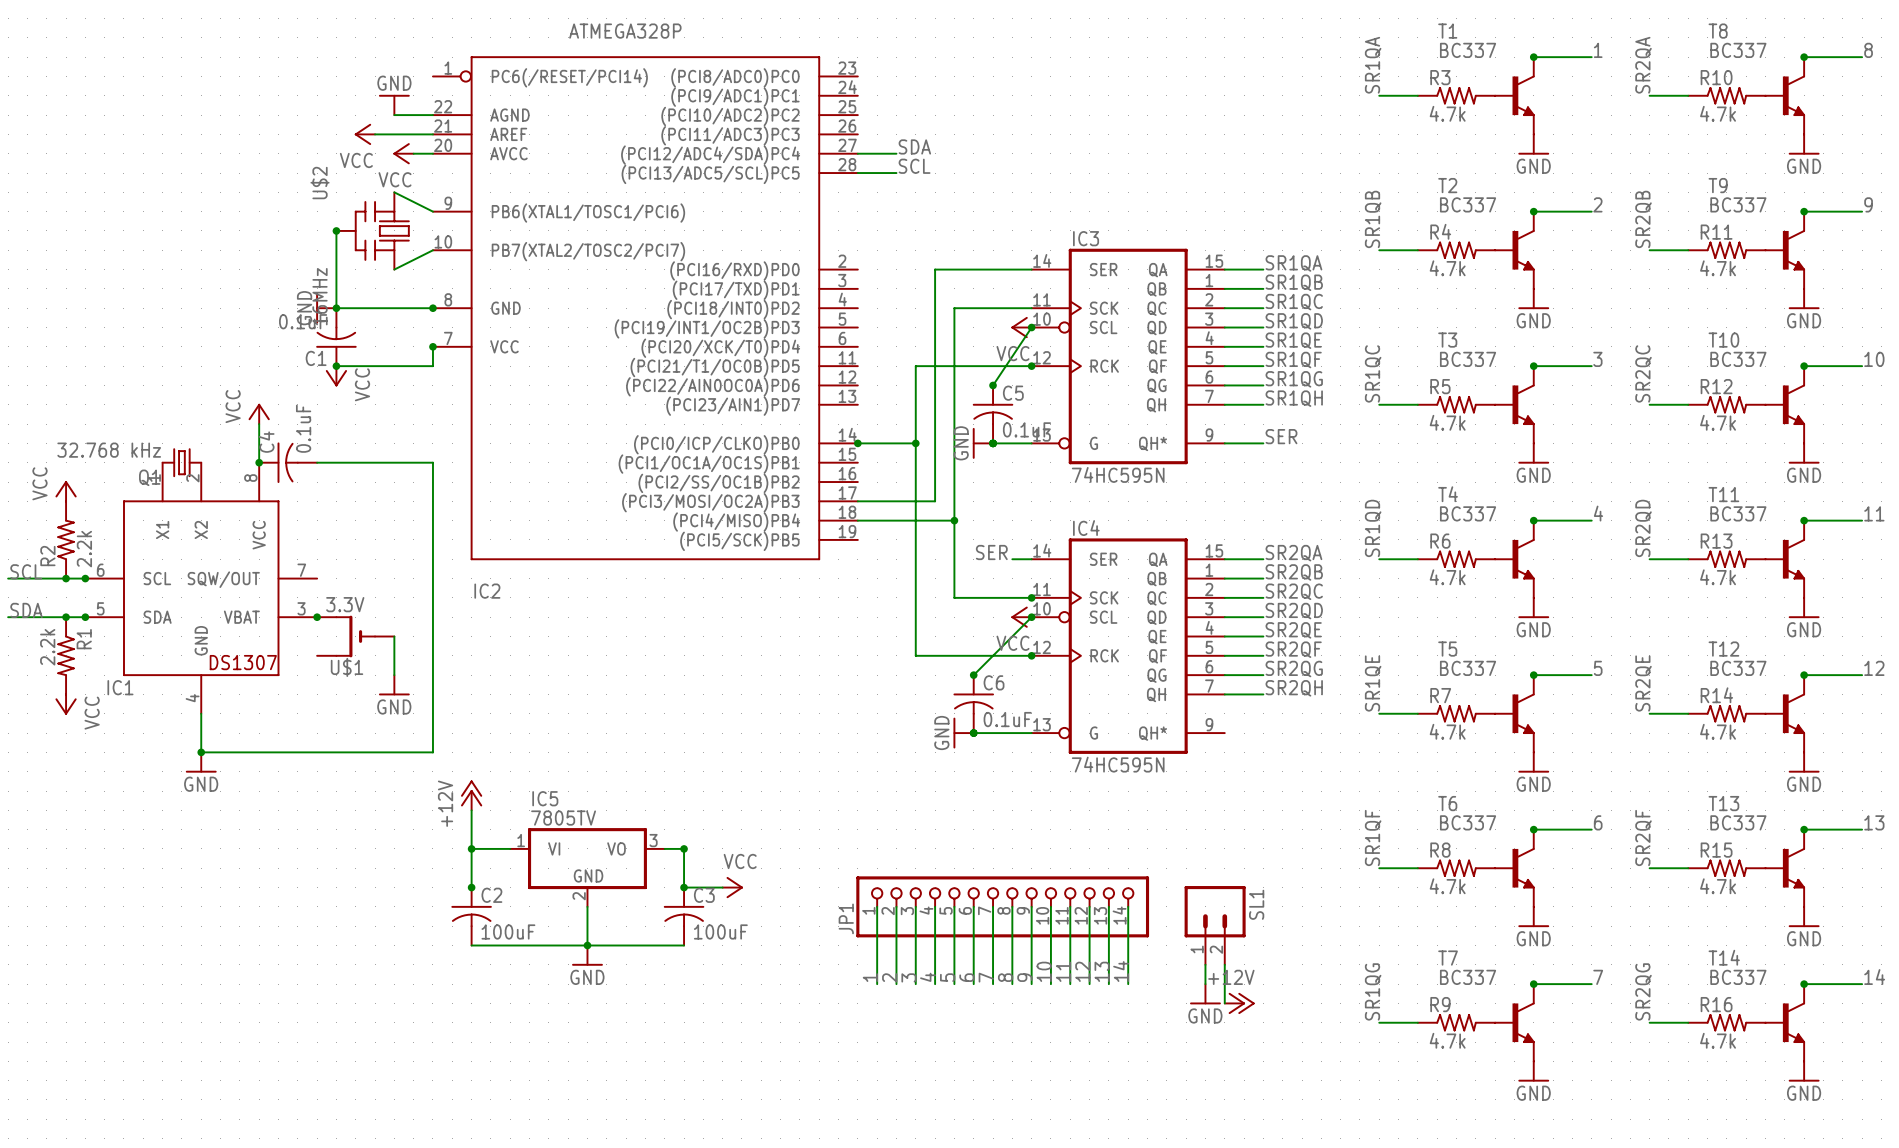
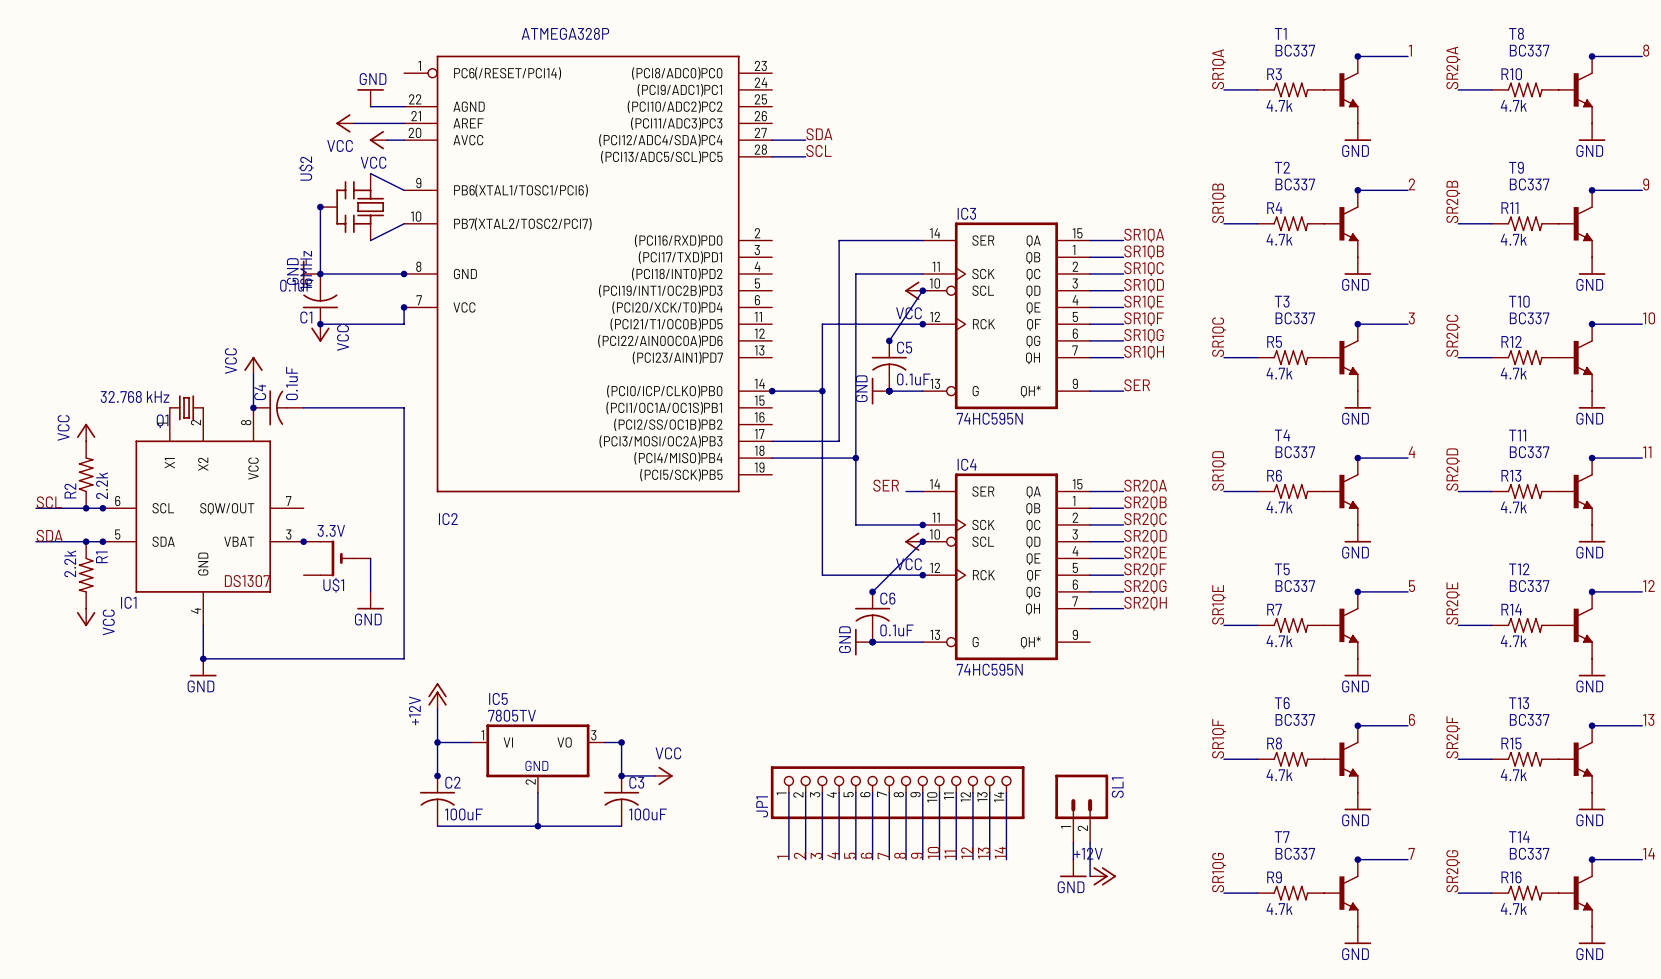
power symbol: GND (587, 955) -> none

